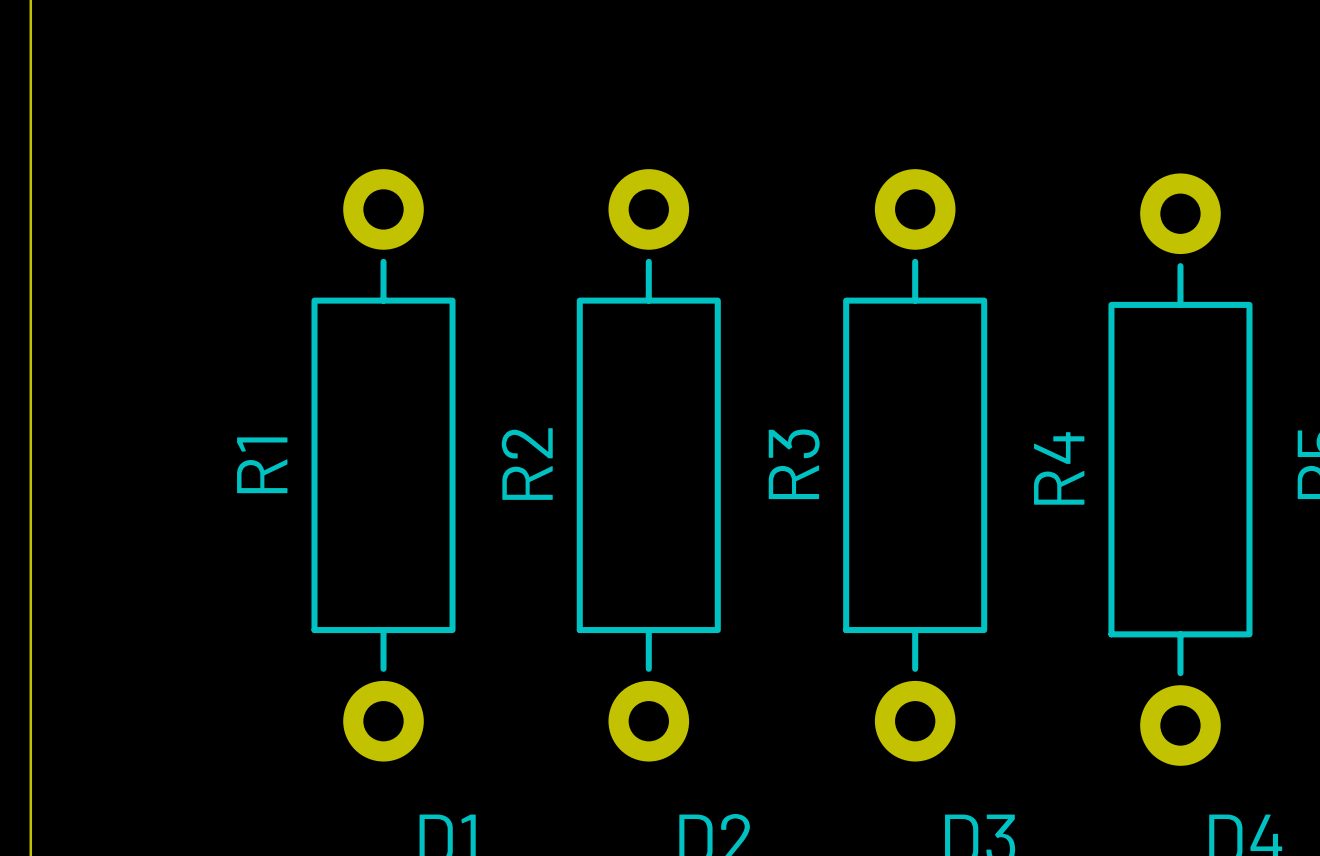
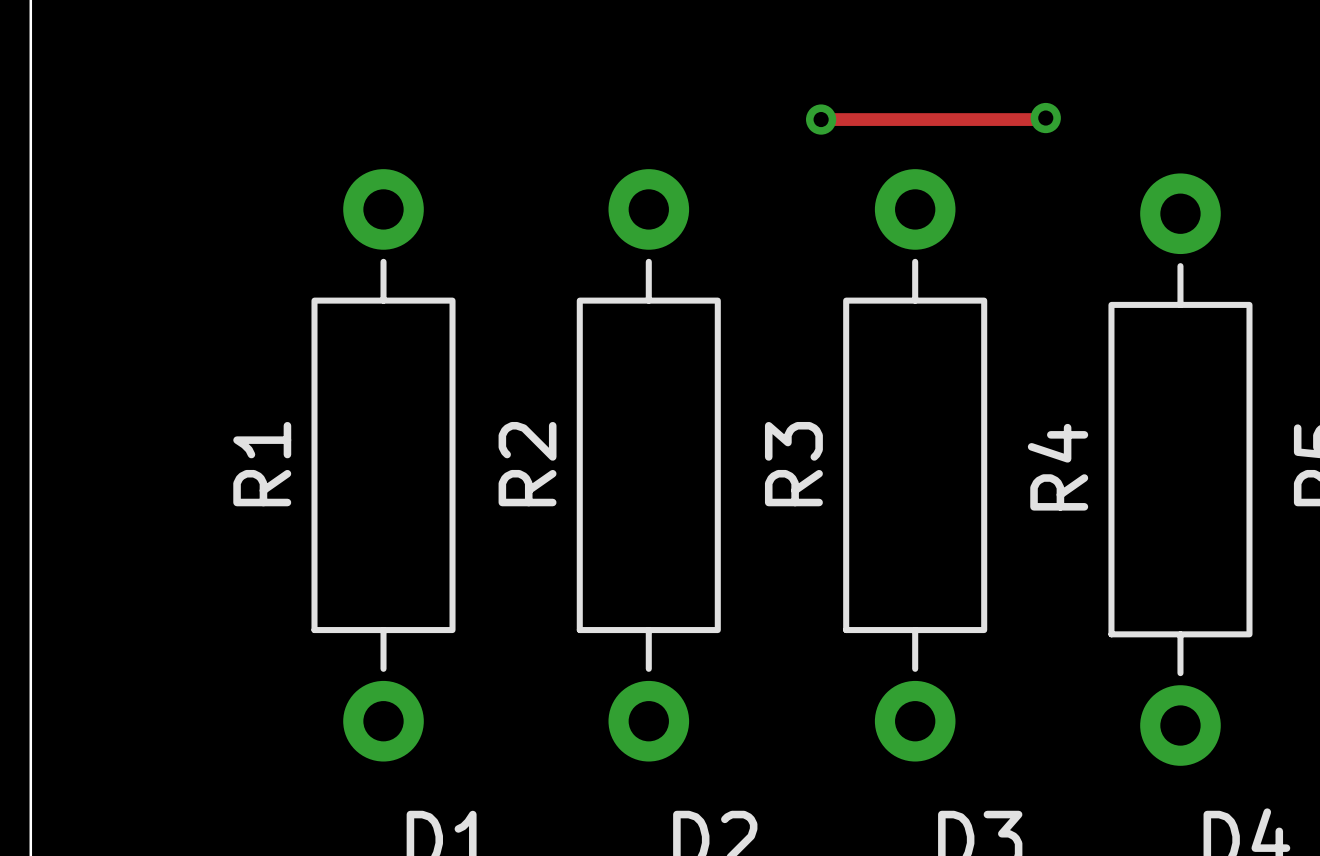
track: none -> (1045, 118) (1044, 119) (821, 119)
via: none -> (1045, 118)
via: none -> (821, 119)

